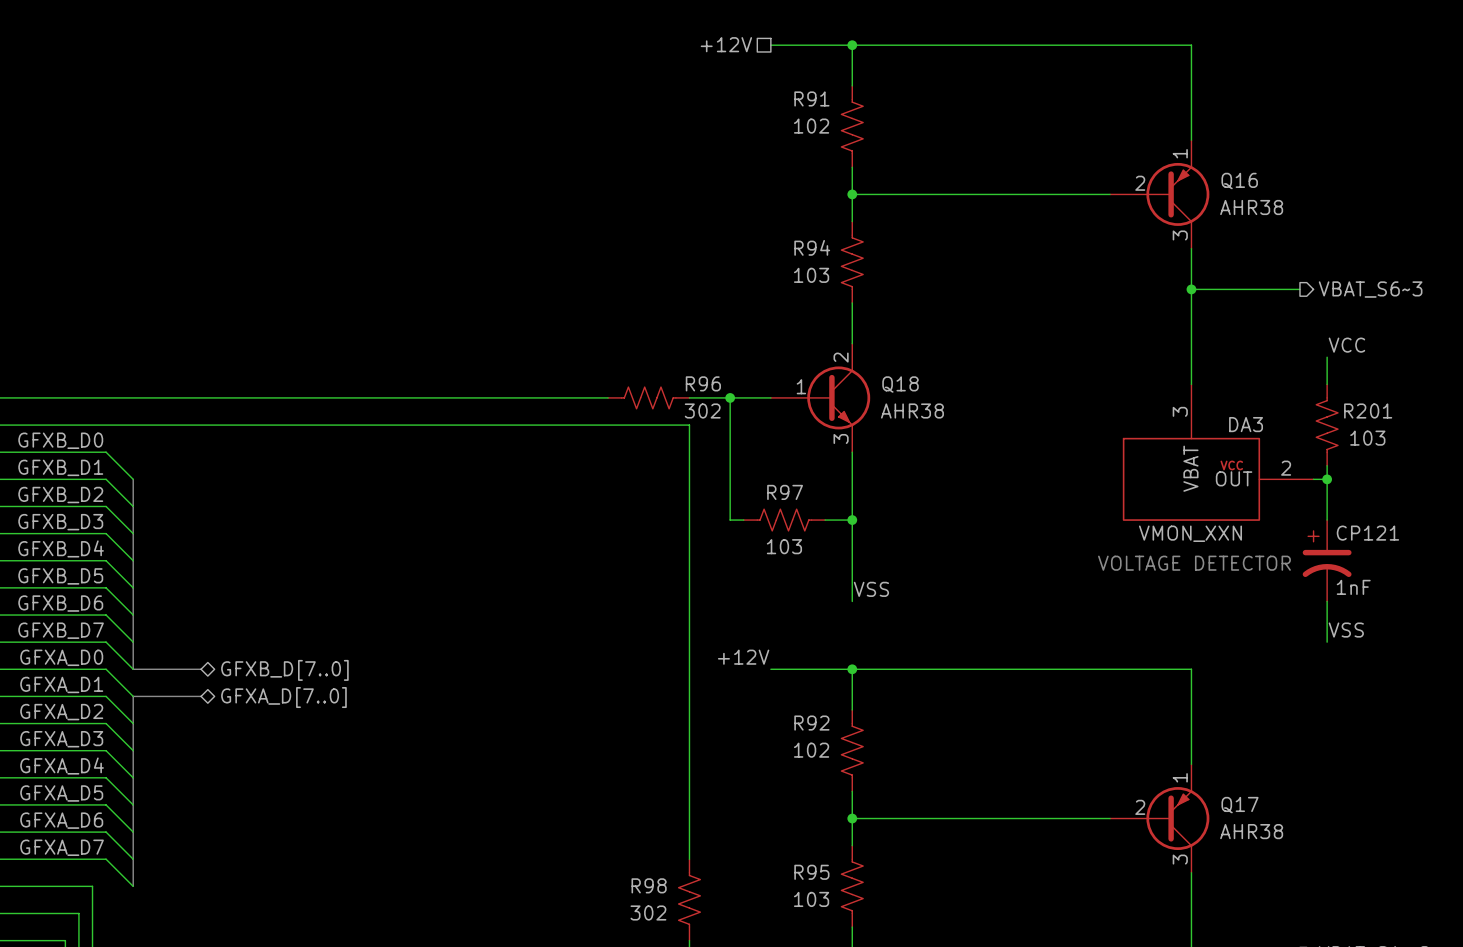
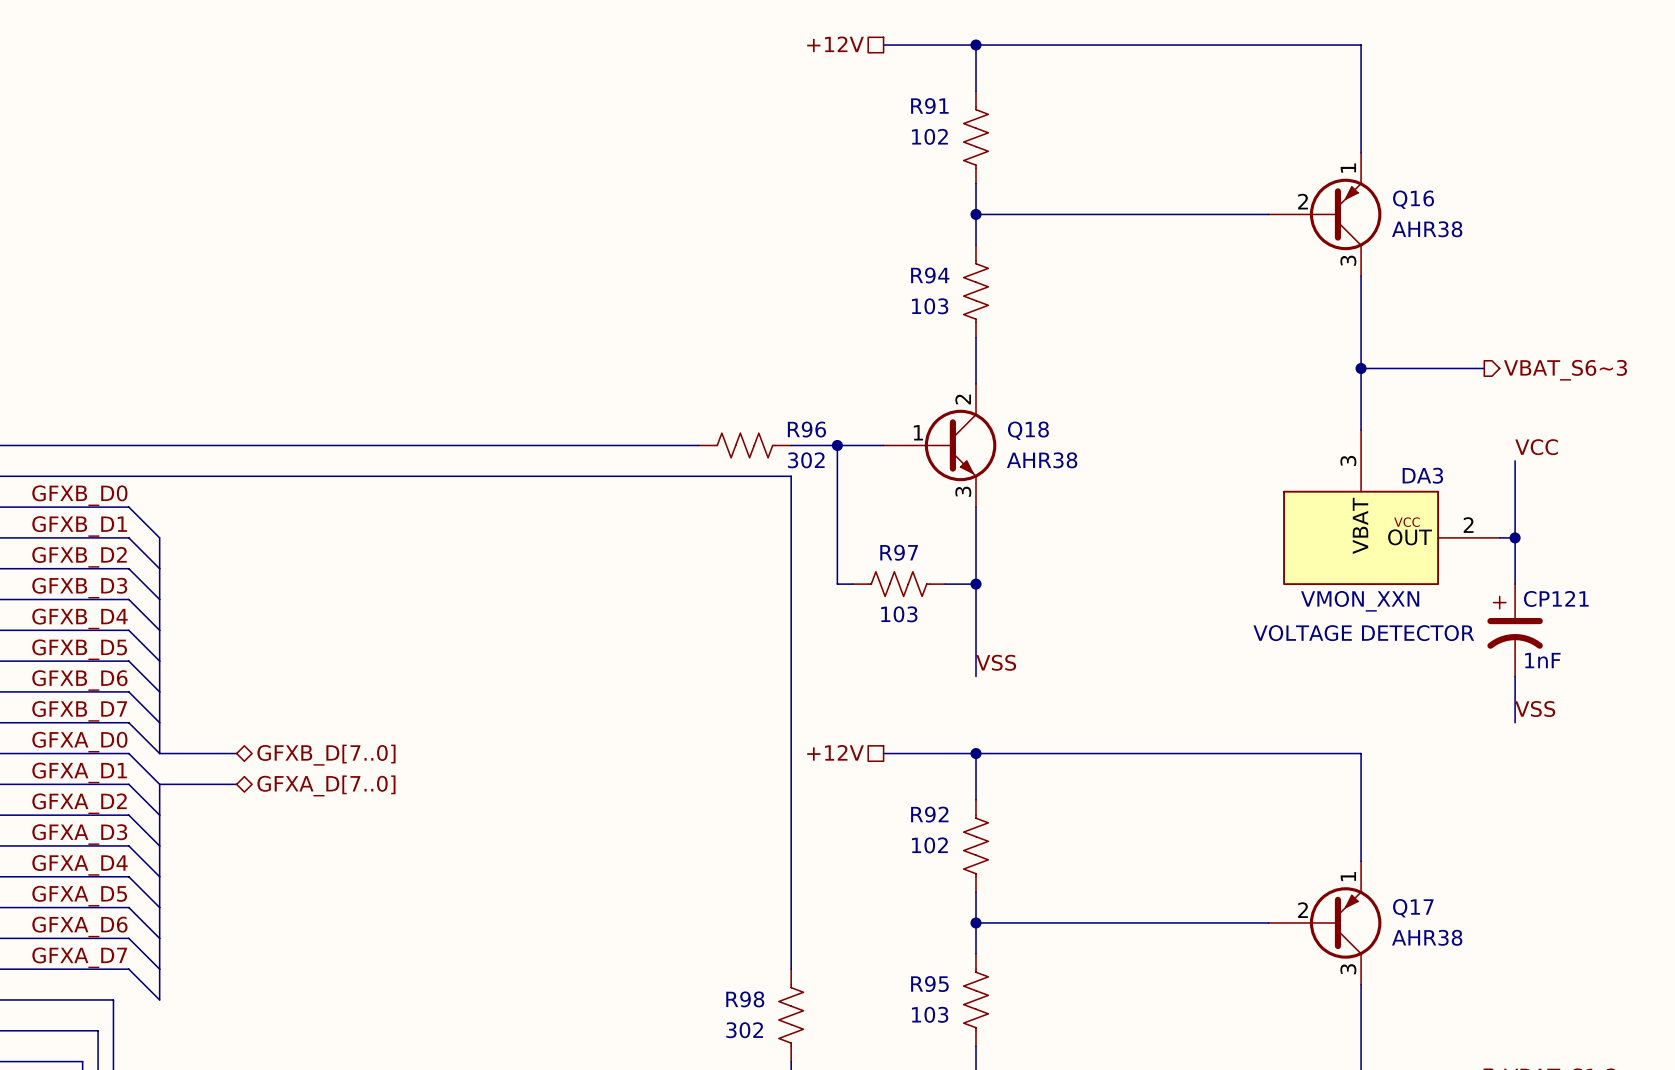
wire: (1191, 289) (1299, 289) -> (1361, 368) (1484, 368)
junction position: (1191, 289) -> (1361, 368)
hierarchical label position: VBAT_S6~3 (1370, 289) -> VBAT_S6~3 (1565, 370)
label position: VCC (1346, 345) -> VCC (1536, 447)
wire: (1327, 357) (1327, 384) -> none
wire: none -> (1515, 460) (1515, 522)
R201: 103 (1327, 425) -> none
label: +12V (743, 657) -> none
hierarchical label: none -> +12V (835, 752)

